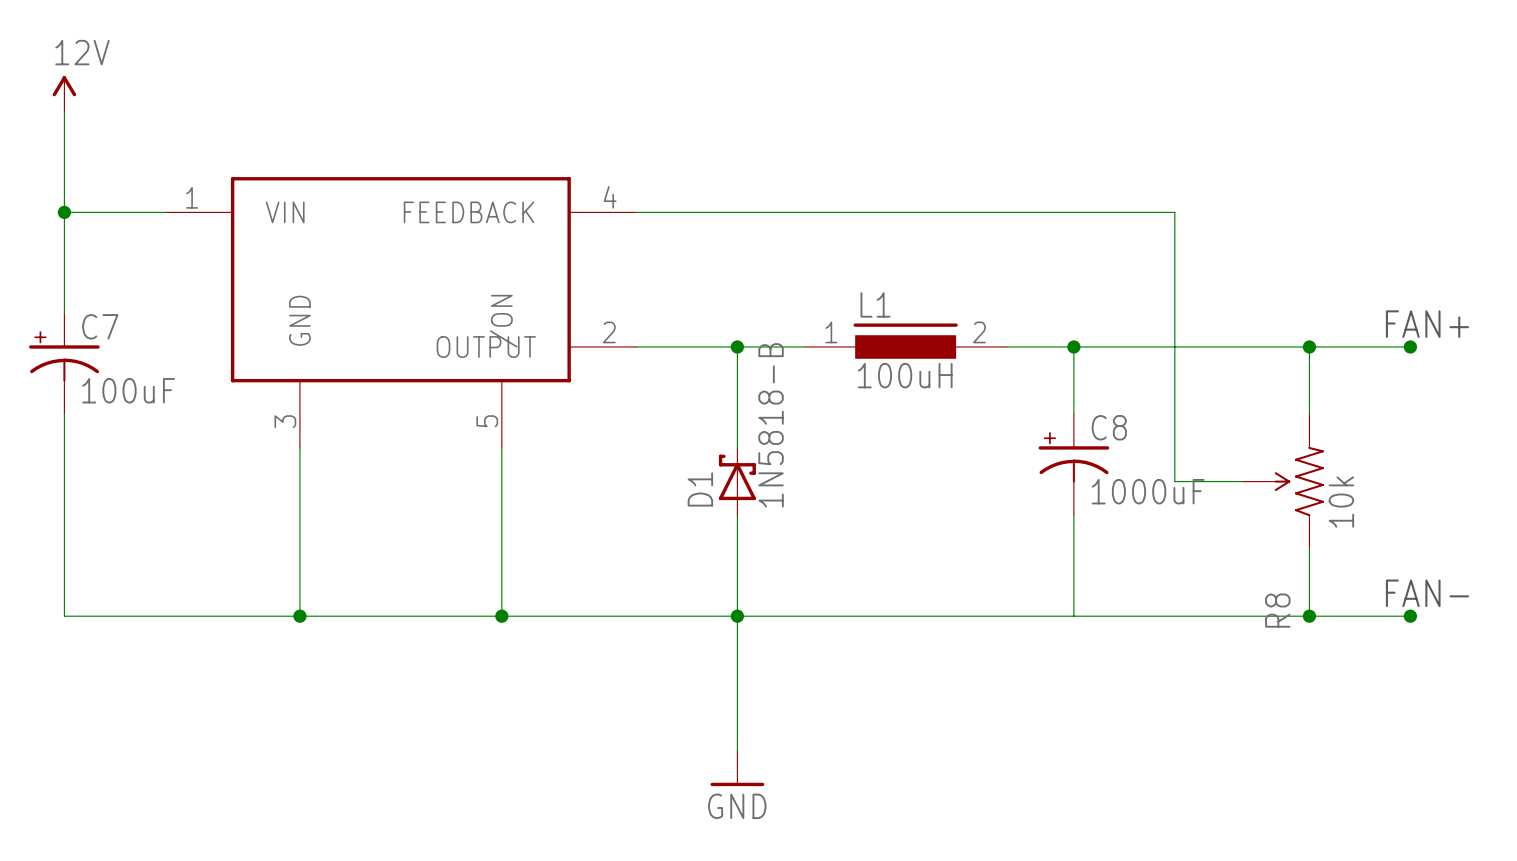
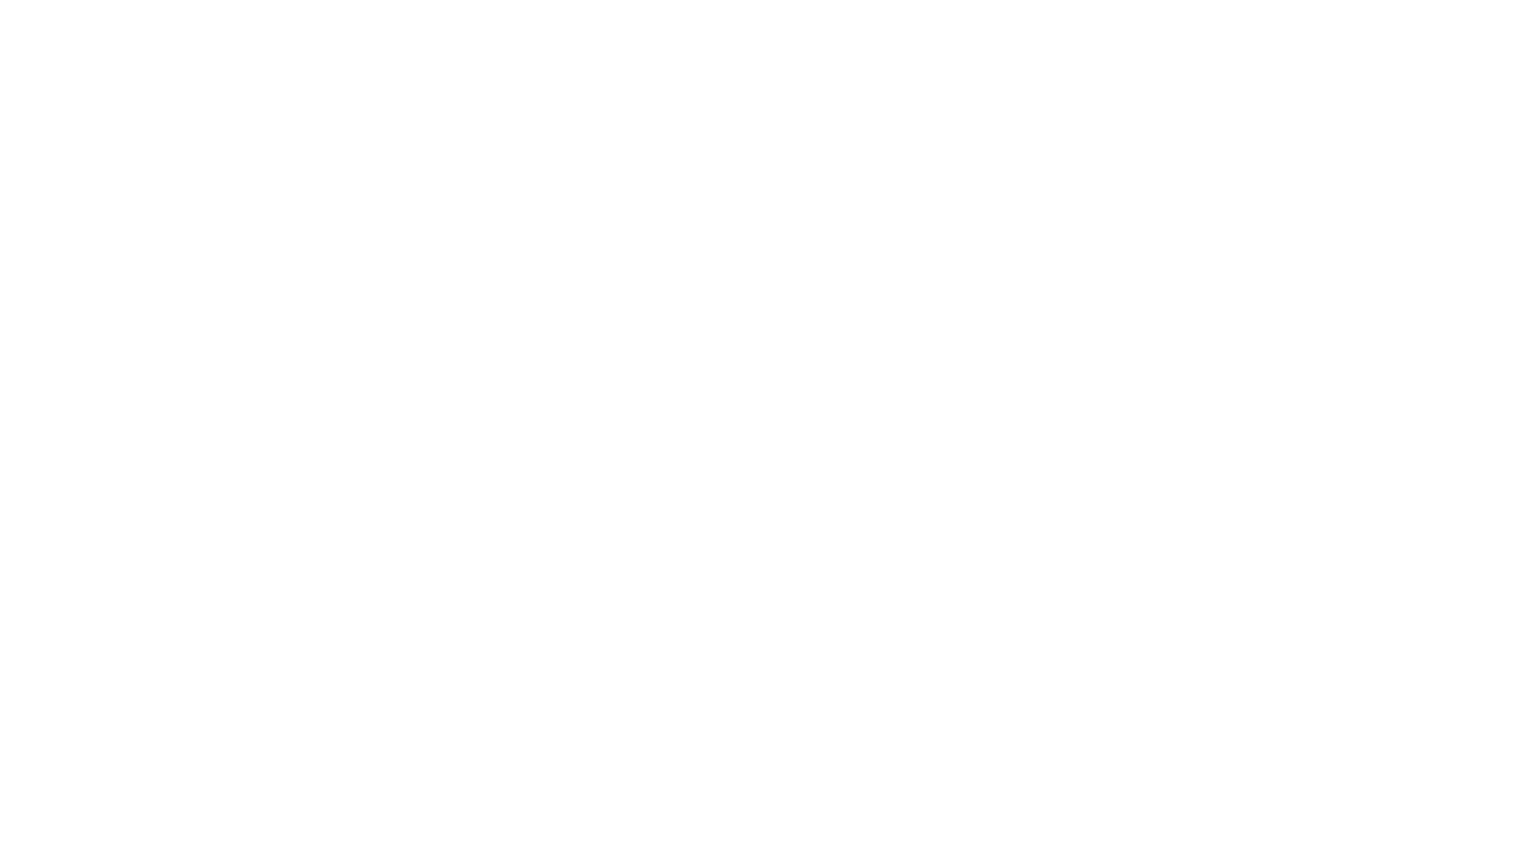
power symbol: 12V (64, 93) -> none
wire: (64, 111) (64, 313) -> none
wire: (64, 212) (165, 212) -> none
junction: (64, 212) -> none
wire: (636, 212) (1174, 212) (1174, 481) (1242, 481) -> none
part: (400, 312) -> none
text: FAN+ (1427, 324) -> none
L1: 100uH (905, 341) -> none
wire: (636, 347) (804, 347) -> none
wire: (737, 347) (737, 447) -> none
junction: (737, 347) -> none
wire: (1006, 347) (1410, 347) -> none
wire: (1073, 347) (1073, 414) -> none
junction: (1073, 347) -> none
wire: (1309, 347) (1309, 414) -> none
junction: (1309, 347) -> none
junction: (1410, 347) -> none
C7: 100uF (64, 363) -> none
wire: (64, 414) (64, 616) (1410, 616) -> none
wire: (299, 447) (299, 616) -> none
wire: (501, 447) (501, 616) -> none
C8: 1000uF (1073, 464) -> none
D1: 1N5818-B (737, 481) -> none
R8: 10k (1283, 481) -> none
wire: (737, 515) (737, 750) -> none
wire: (1073, 515) (1073, 616) -> none
wire: (1309, 548) (1309, 616) -> none
text: FAN- (1427, 593) -> none
junction: (299, 616) -> none
junction: (501, 616) -> none
junction: (737, 616) -> none
junction: (1309, 616) -> none
junction: (1410, 616) -> none
power symbol: GND (737, 768) -> none

